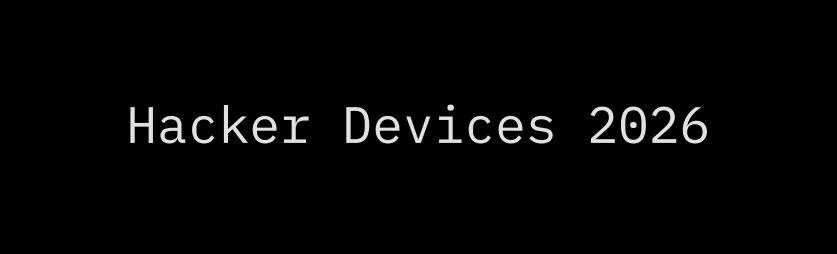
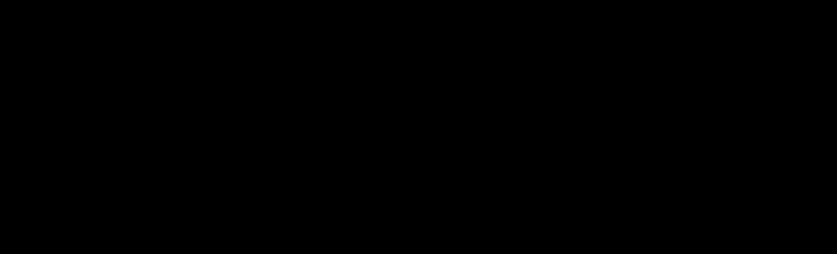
text: Hacker Devices 2026 (418, 124) -> none

